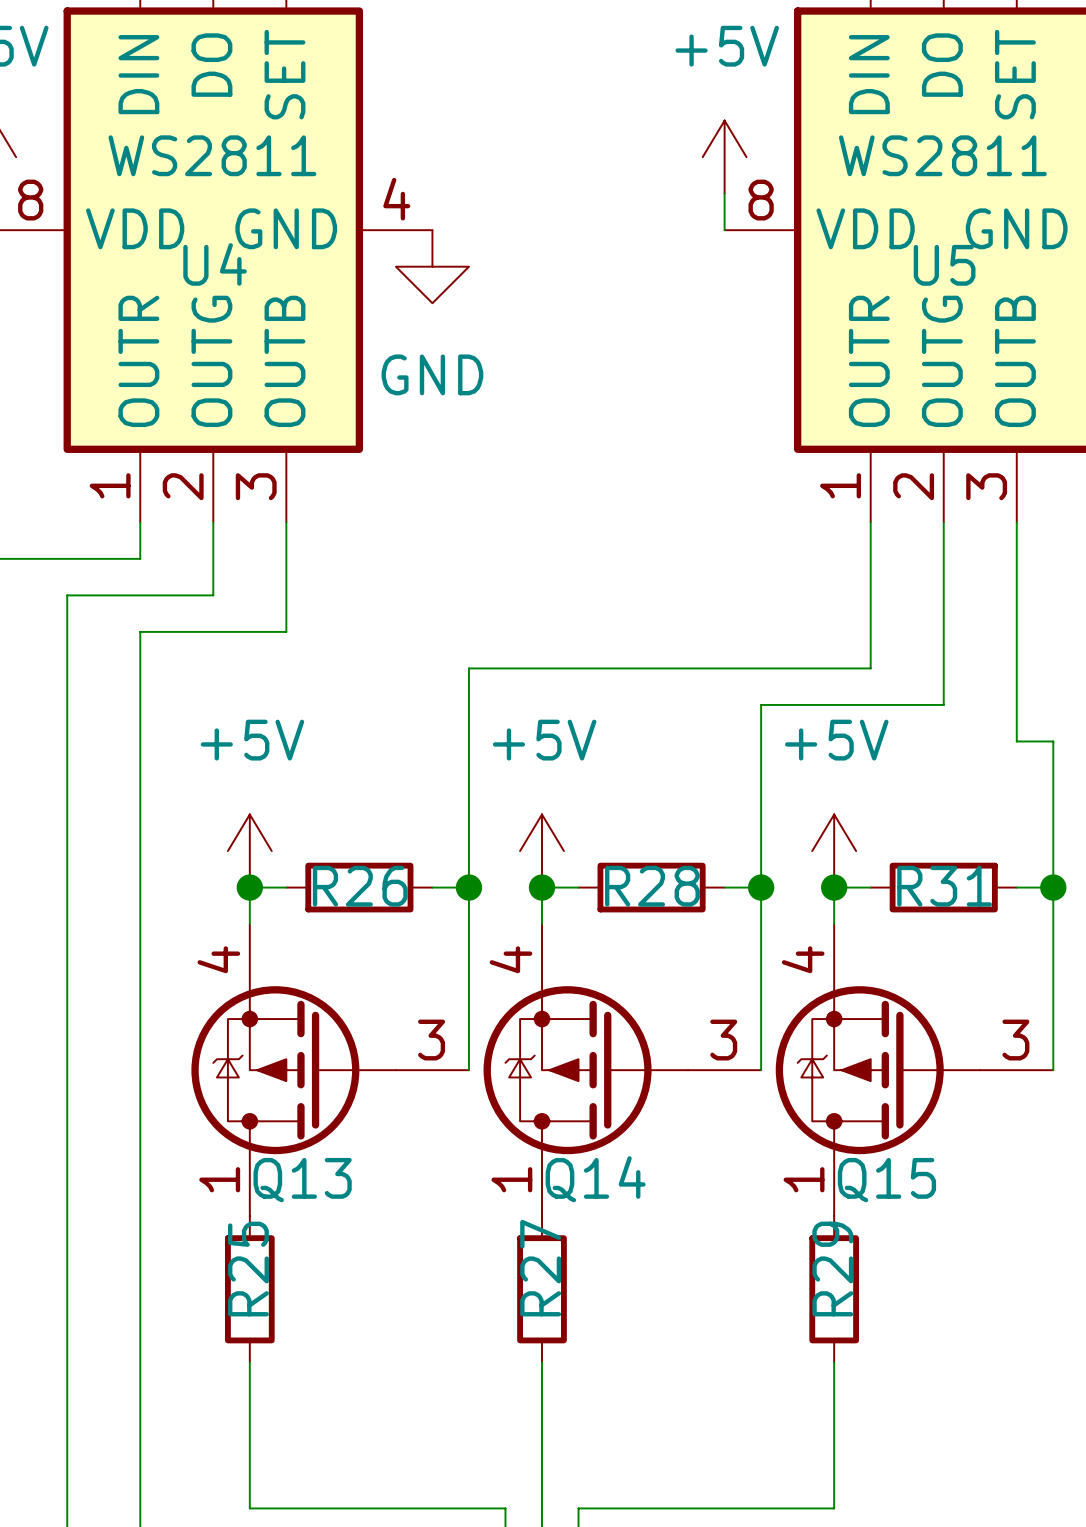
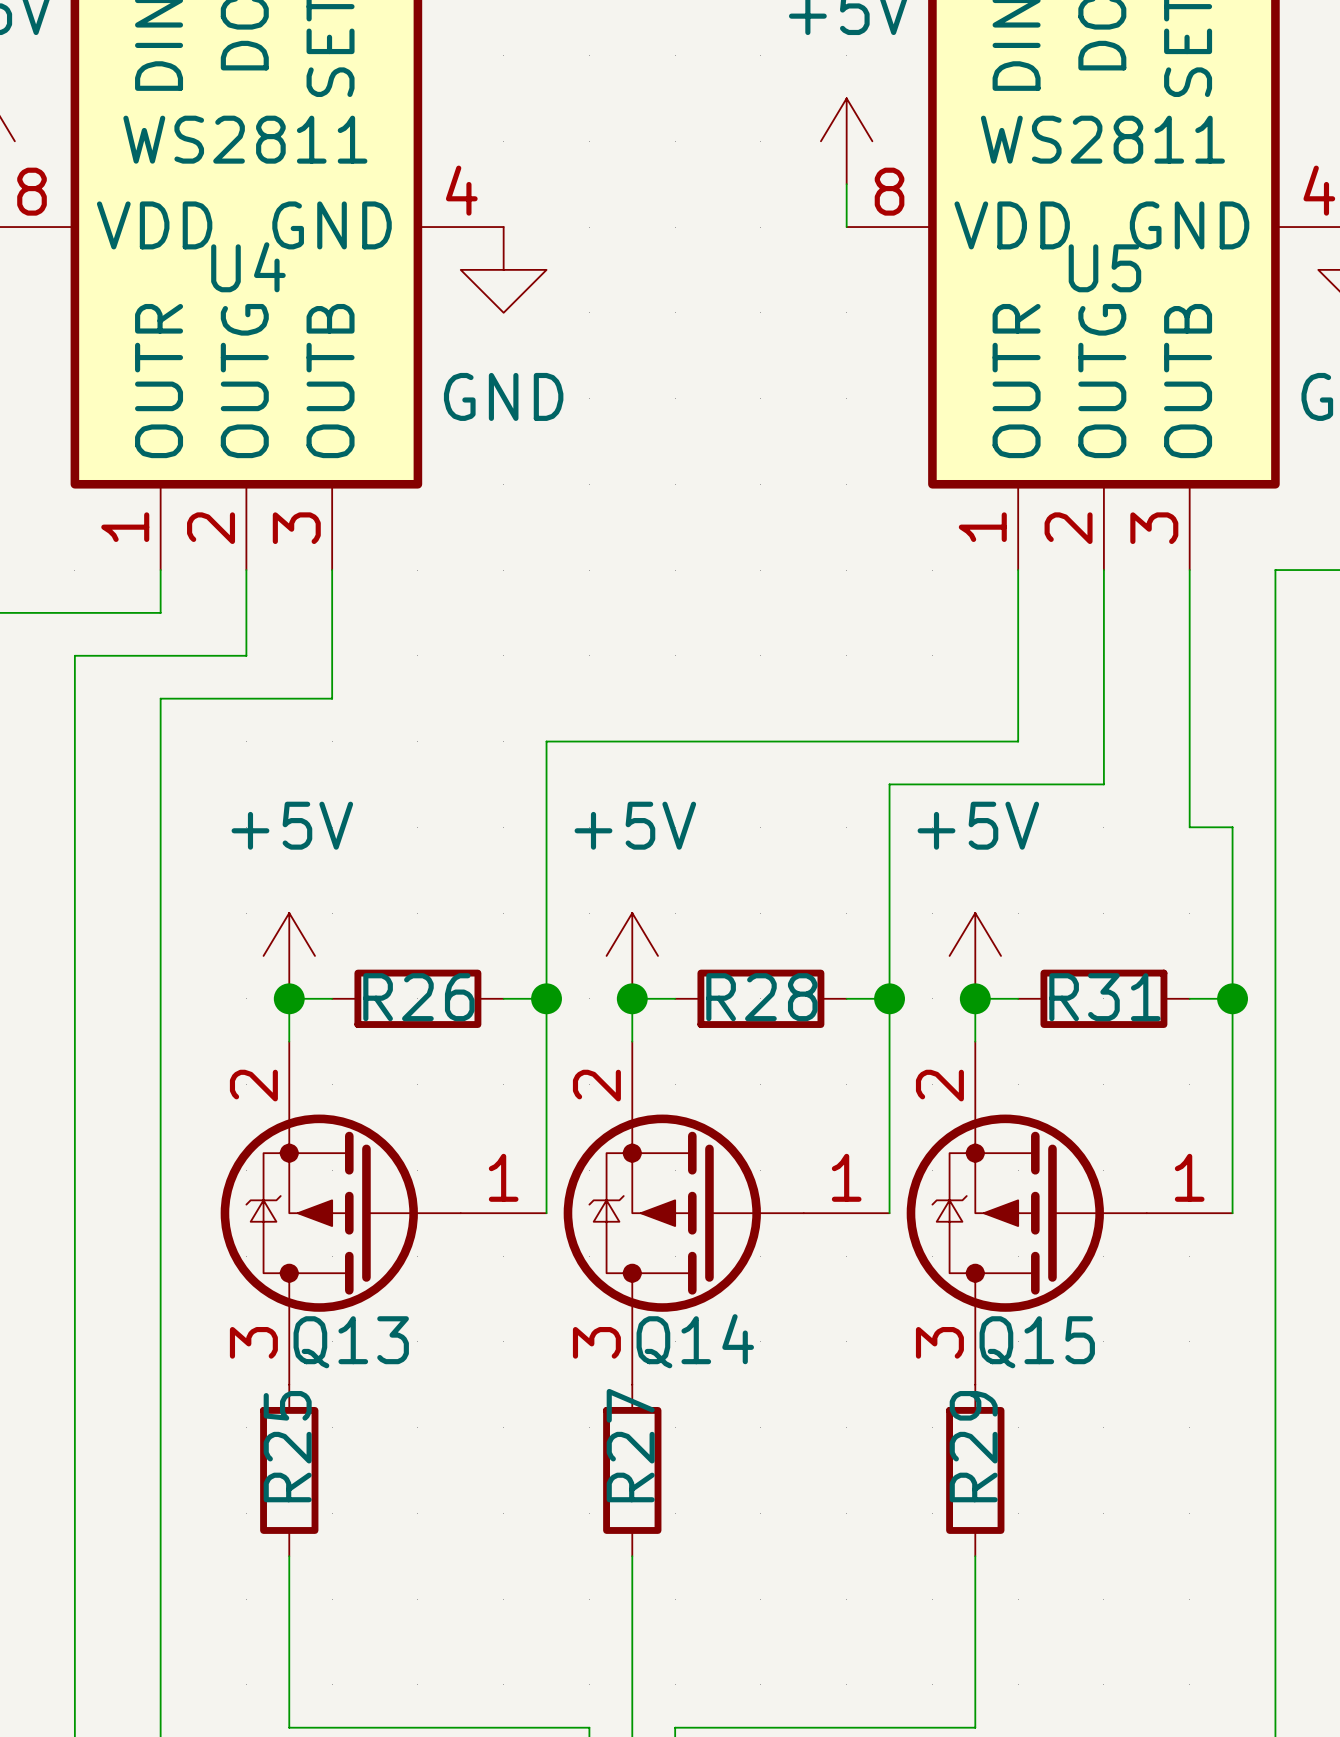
Q13 pin number: 4 (218, 959) -> 2 (253, 1085)
Q14 pin number: 4 (511, 959) -> 2 (596, 1085)
Q15 pin number: 4 (803, 959) -> 2 (939, 1085)
Q13 pin number: 3 (431, 1040) -> 1 (503, 1177)
Q14 pin number: 3 (723, 1040) -> 1 (846, 1177)
Q15 pin number: 3 (1015, 1040) -> 1 (1189, 1177)
Q13 pin number: 1 (219, 1179) -> 3 (253, 1342)
Q14 pin number: 1 (511, 1179) -> 3 (596, 1342)
Q15 pin number: 1 (804, 1179) -> 3 (939, 1342)

